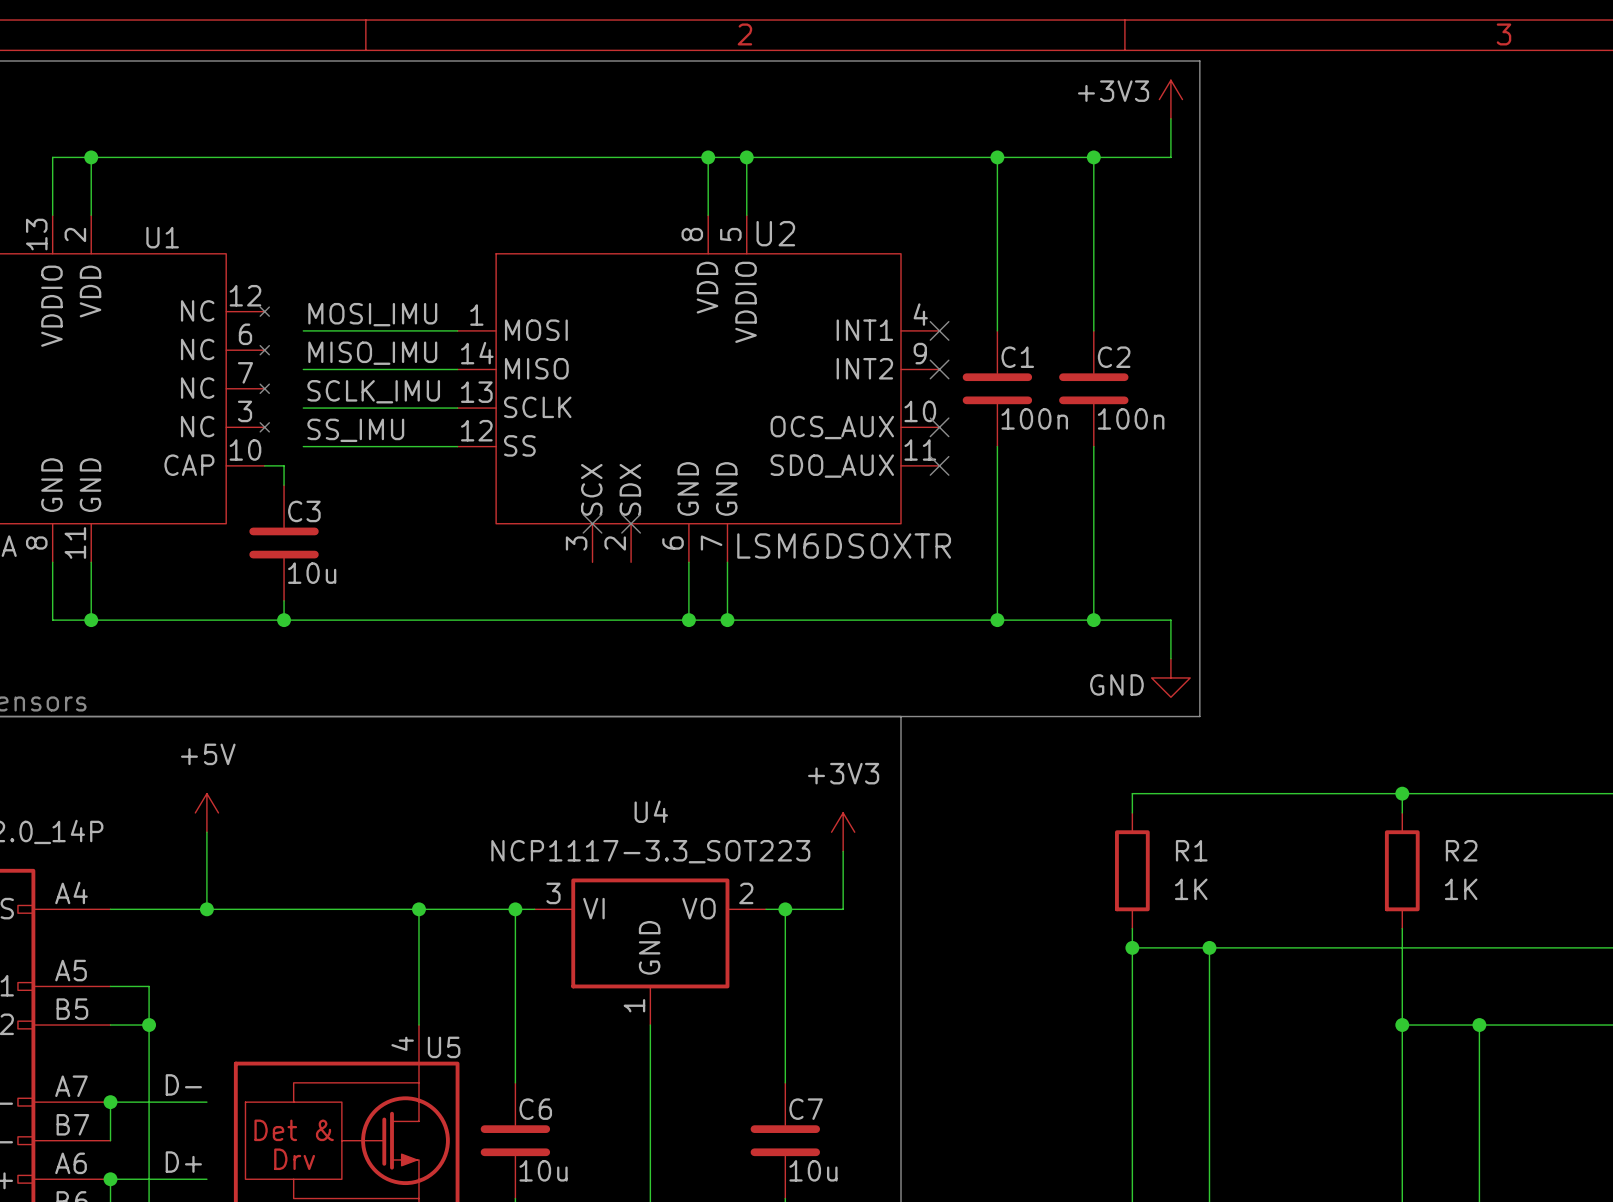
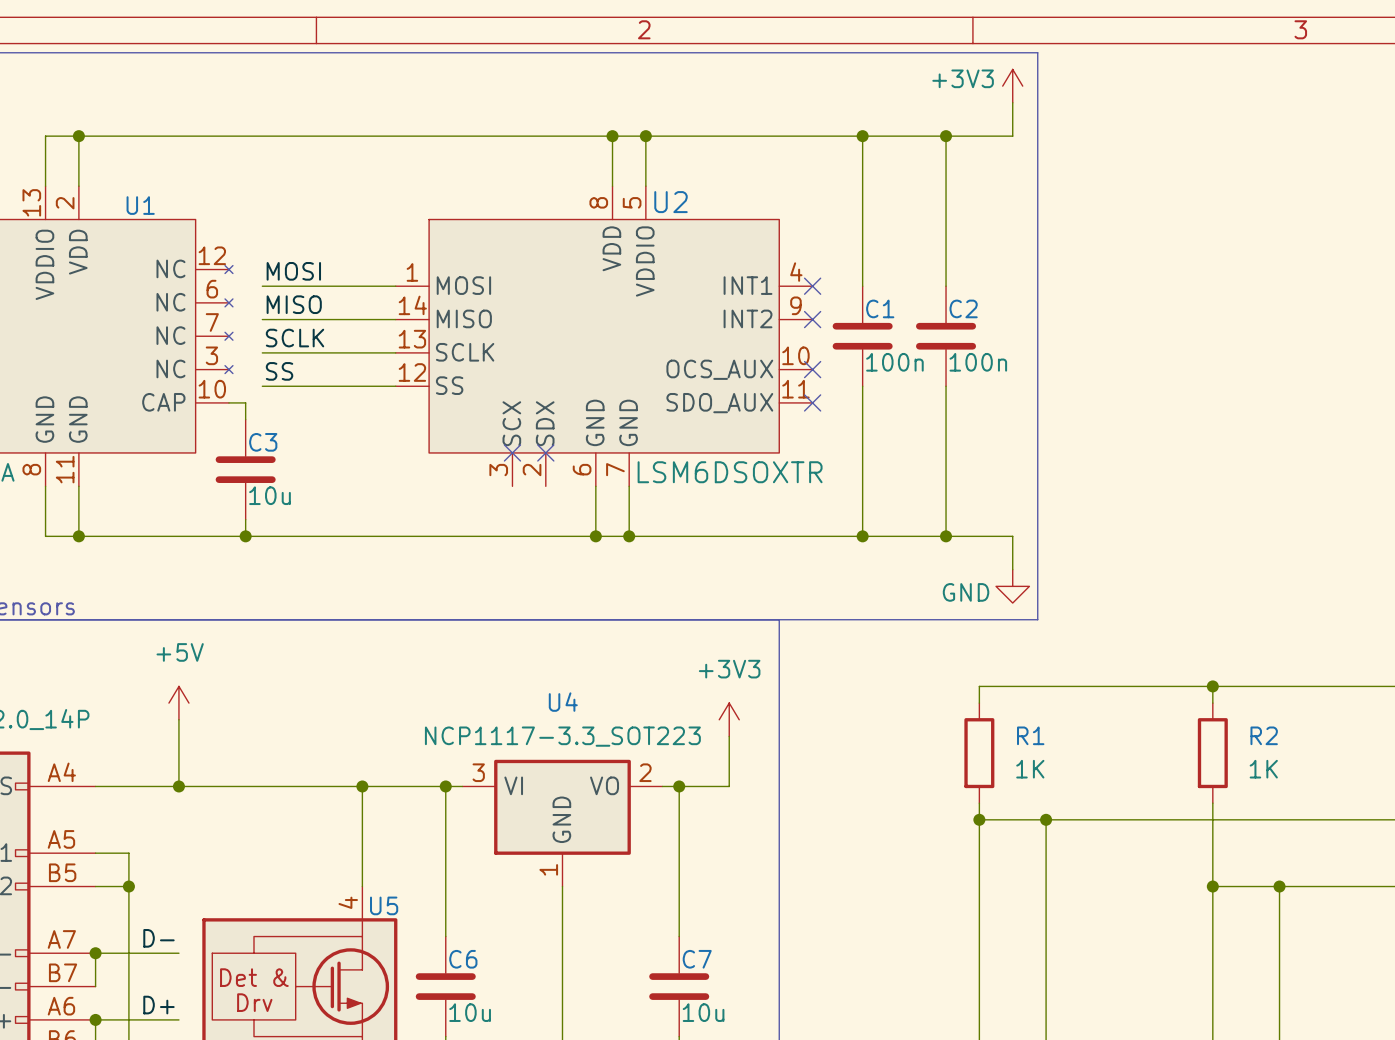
label: MOSI_IMU (372, 314) -> MOSI (293, 271)
label: MISO_IMU (372, 353) -> MISO (294, 304)
label: SCLK_IMU (373, 391) -> SCLK (295, 338)
label: SS_IMU (355, 430) -> SS (279, 371)

